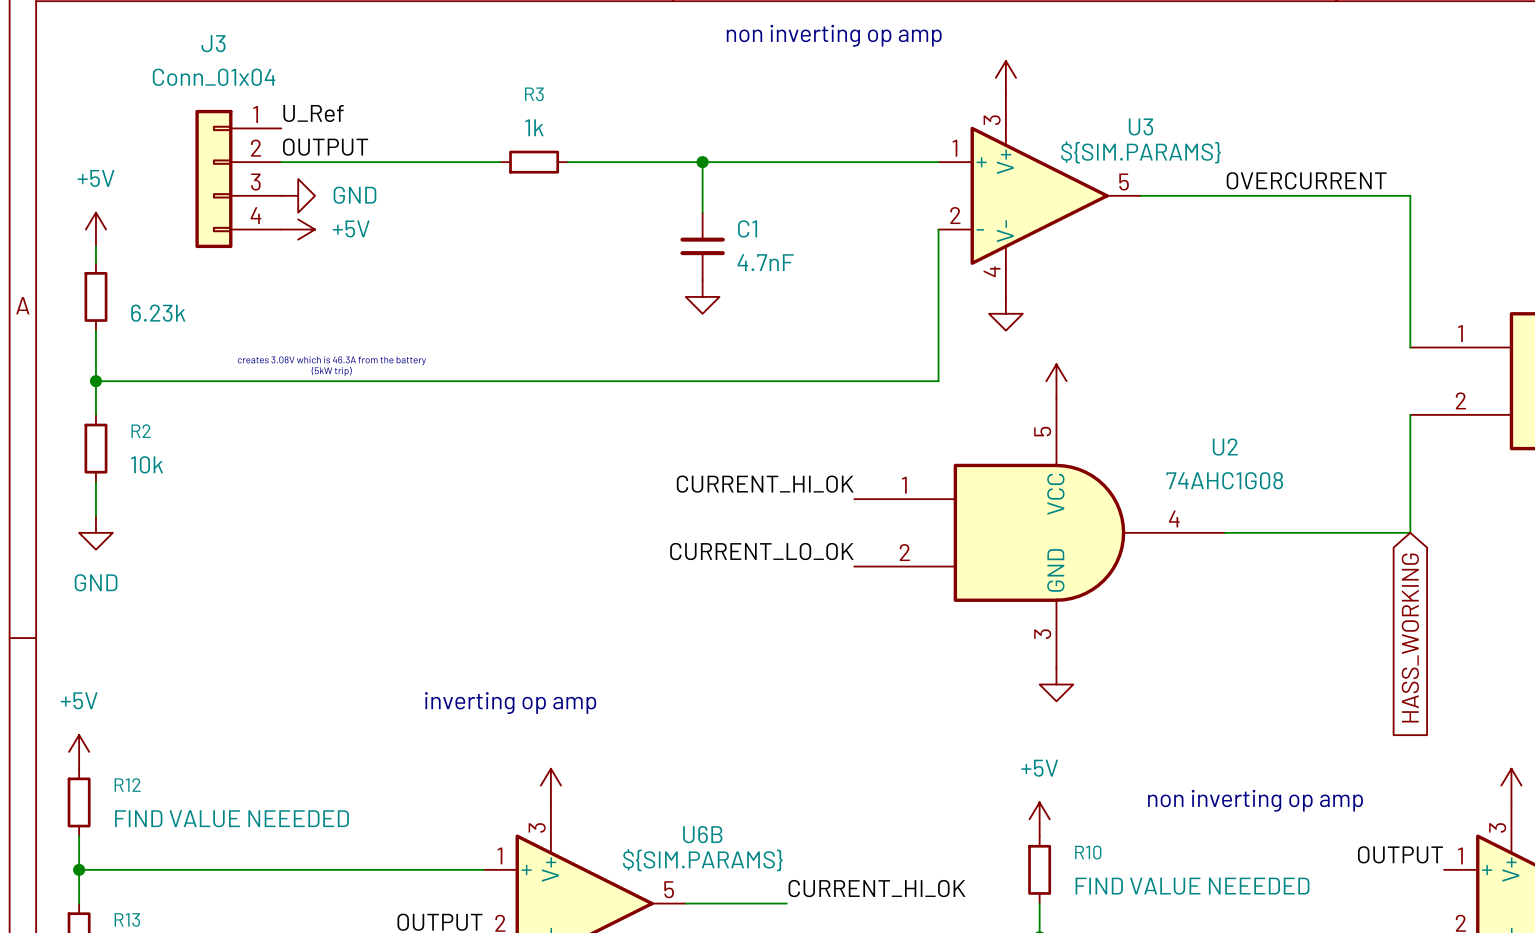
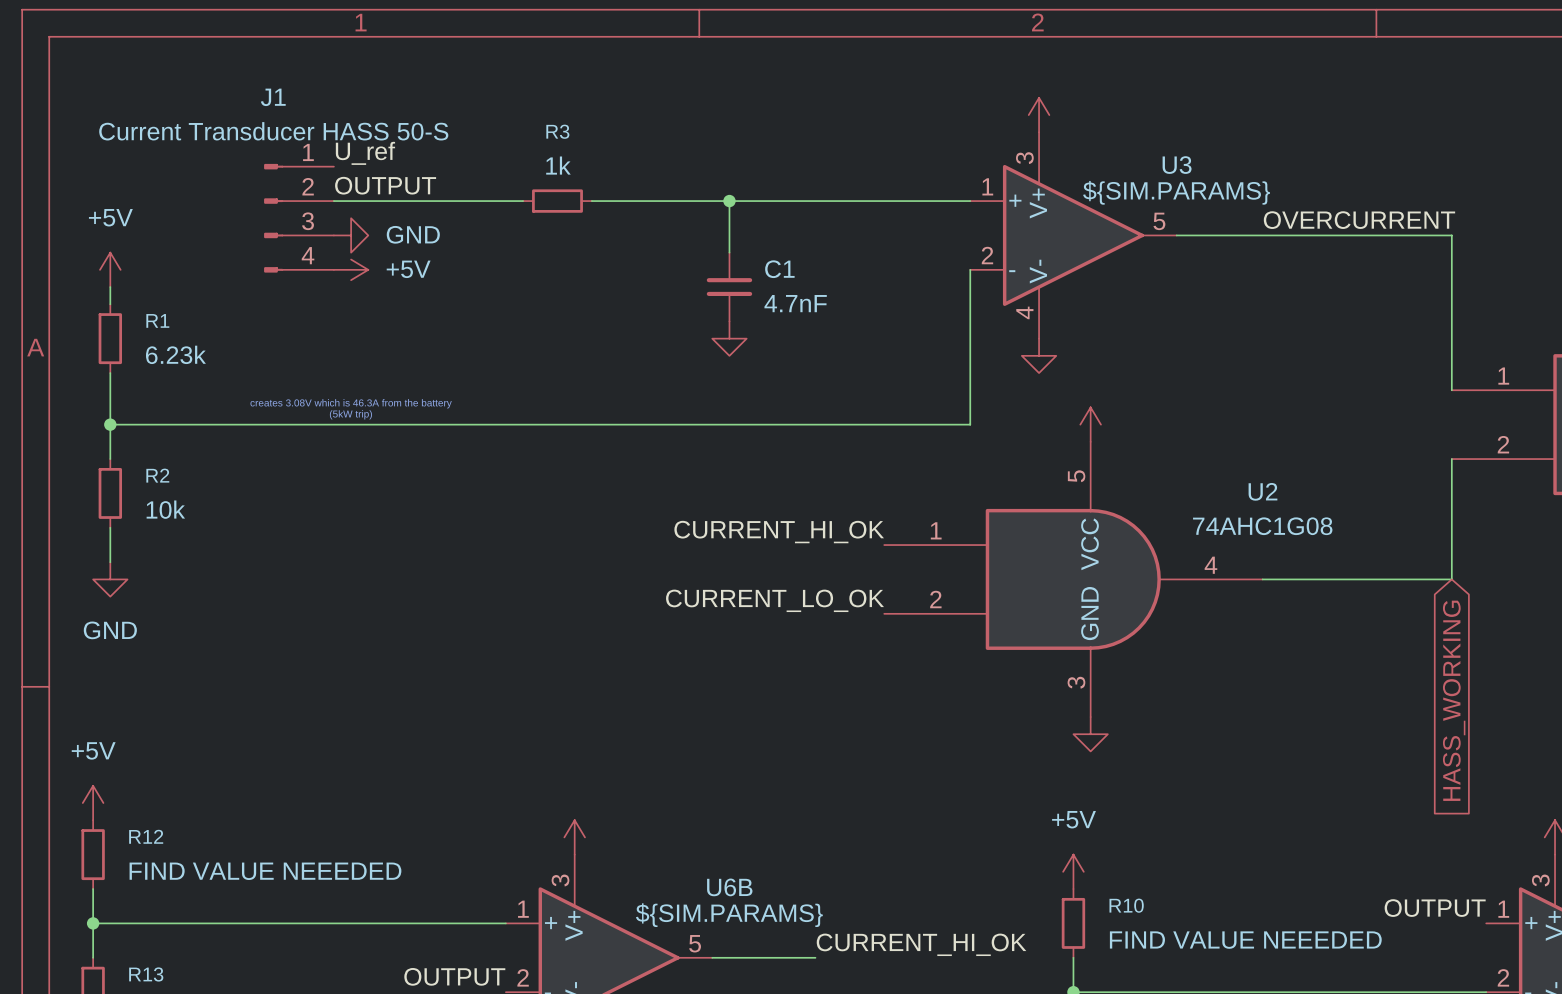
text: non inverting op amp (834, 35) -> none
label: U_Ref (313, 113) -> U_ref (365, 153)
label position: OUTPUT (325, 147) -> OUTPUT (385, 185)
J3: Conn_01x04 (238, 178) -> none
J1: none -> Current Transducer HASS 50-S (298, 218)
power symbol position: GND (298, 195) -> GND (351, 235)
power symbol position: +5V (298, 229) -> +5V (351, 269)
R1 name: none -> R1 (157, 320)
text: inverting op amp (510, 703) -> none
text: non inverting op amp (1255, 800) -> none

